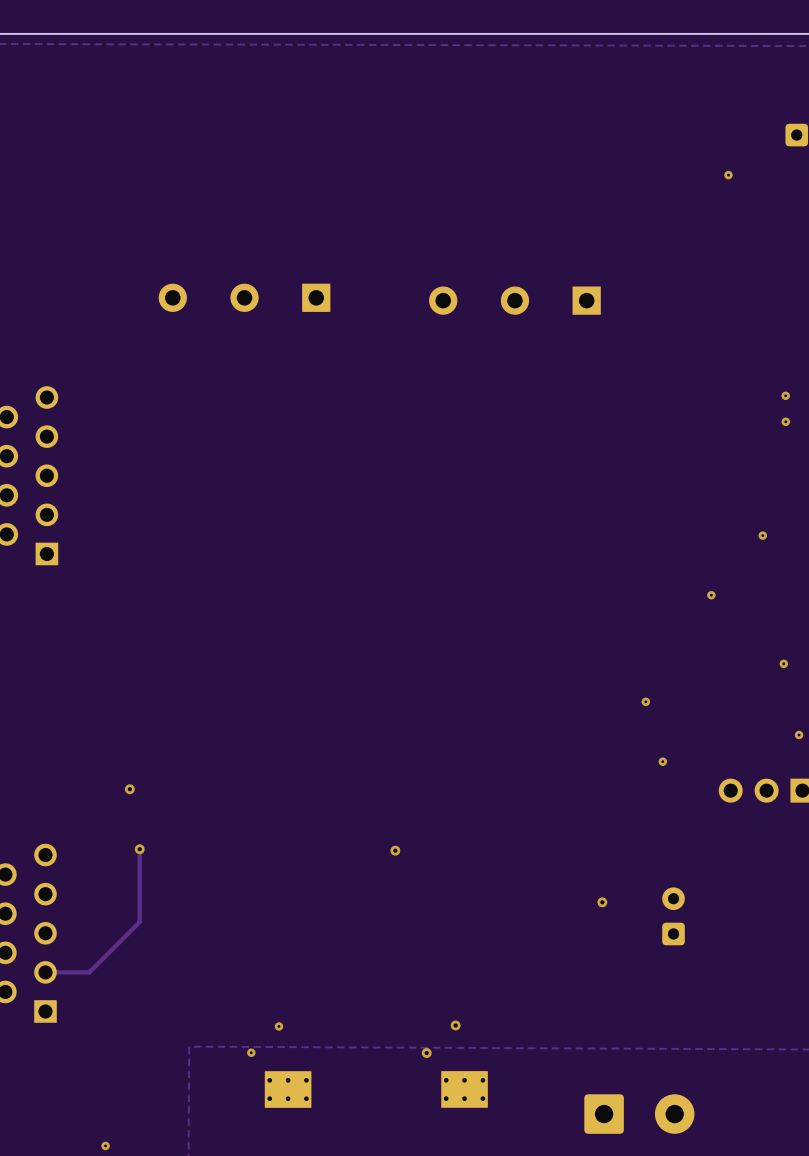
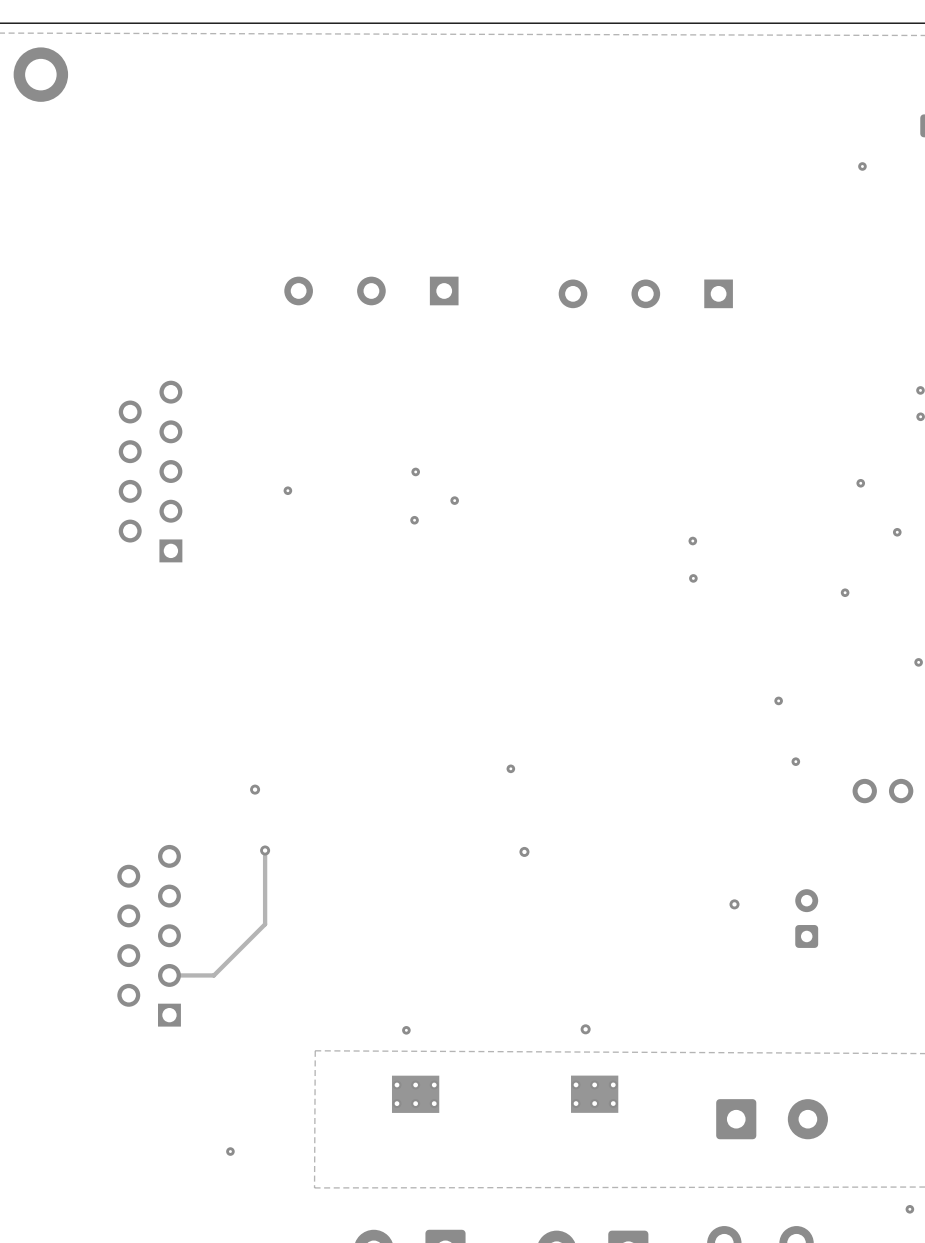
via: none -> (415, 471)
via: none -> (860, 483)
via: none -> (287, 490)
via: none -> (454, 500)
via: none -> (414, 520)
via: none -> (692, 541)
via: none -> (693, 578)
via: none -> (510, 768)
via: (251, 1052) -> none
via: (426, 1053) -> none

